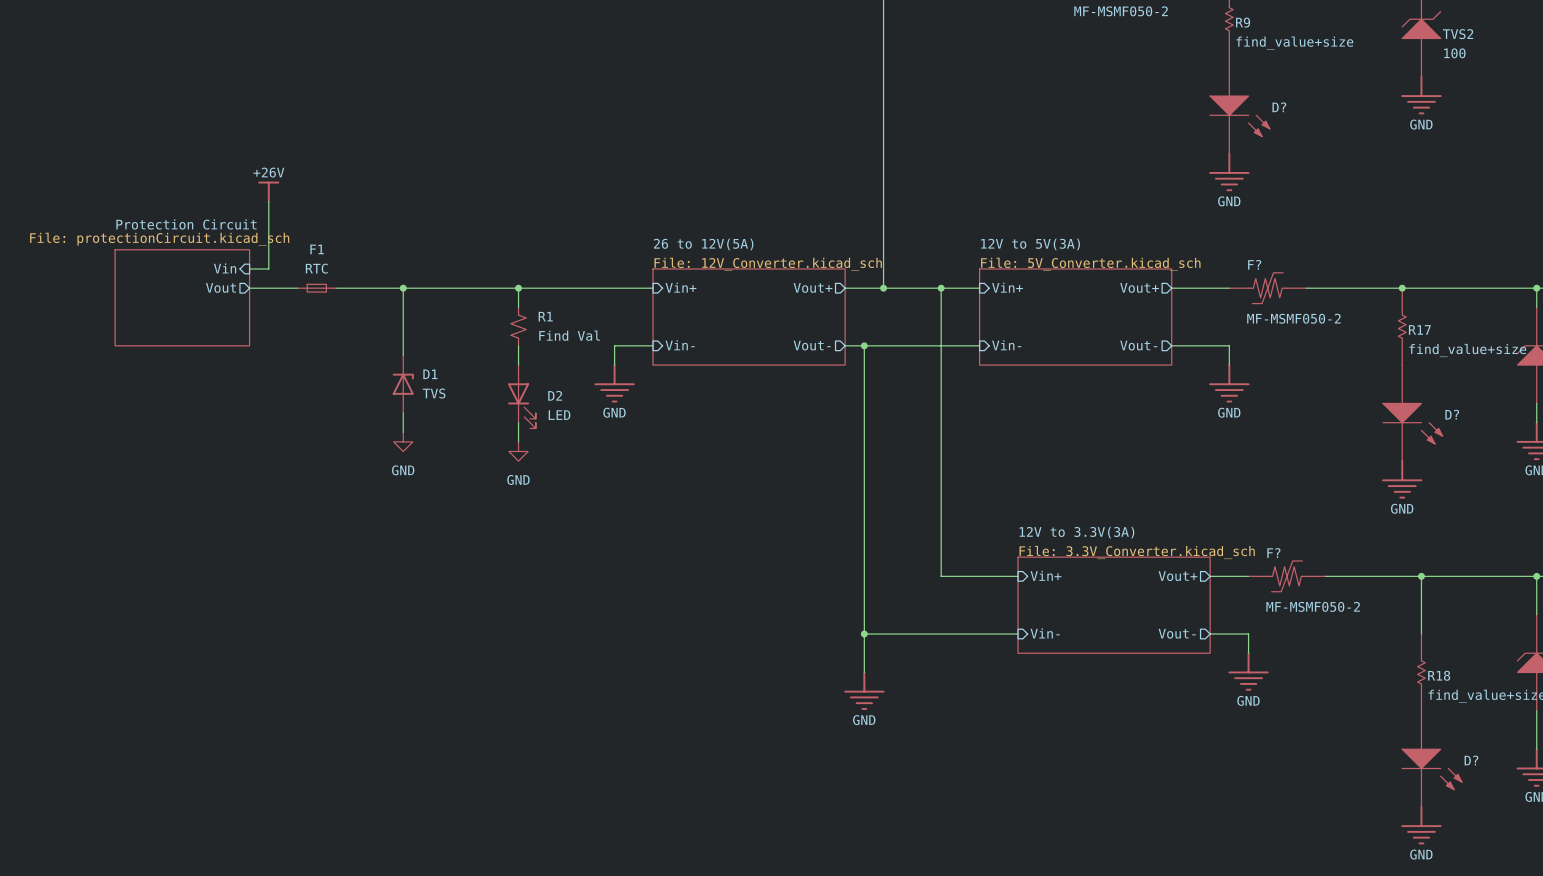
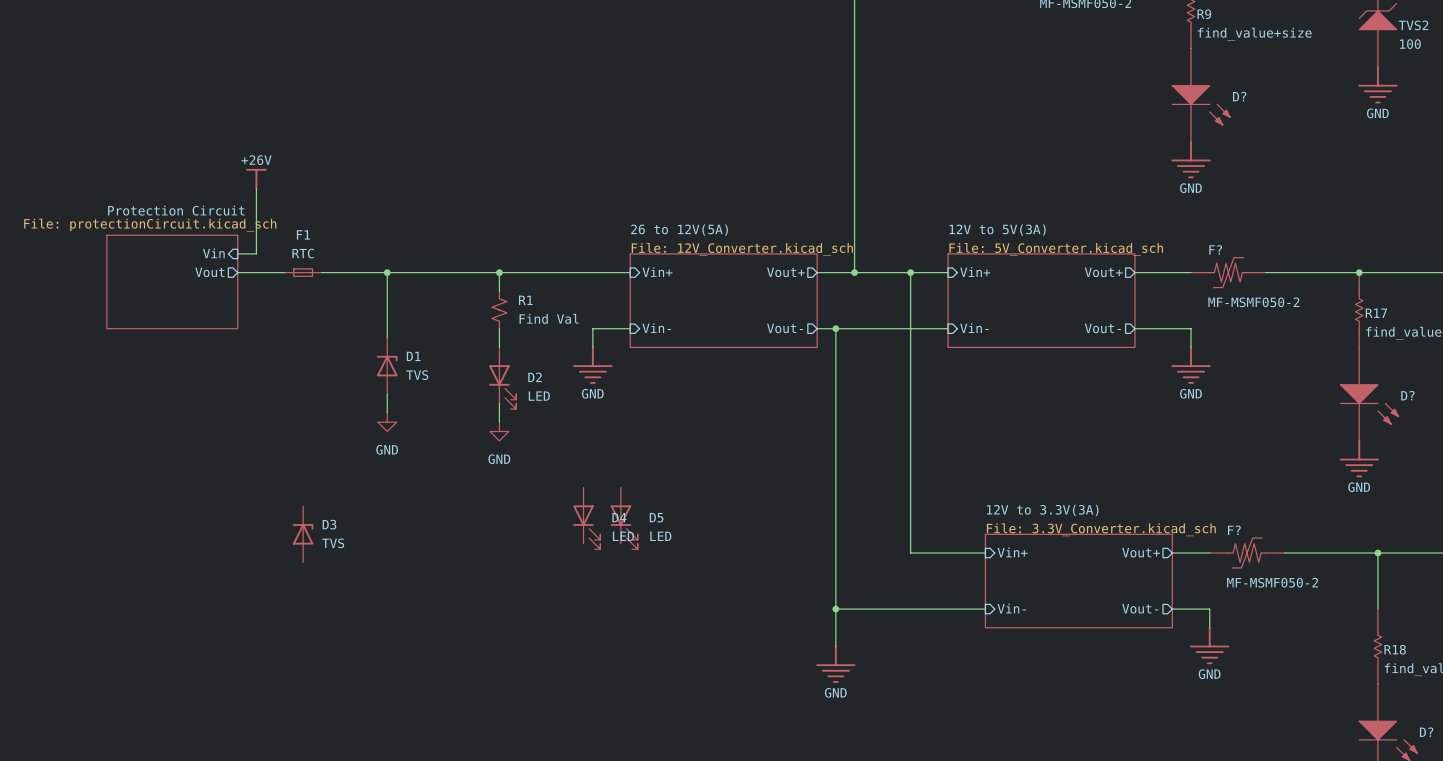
D4: none -> LED (586, 518)
D5: none -> LED (624, 518)
D3: none -> TVS (303, 534)

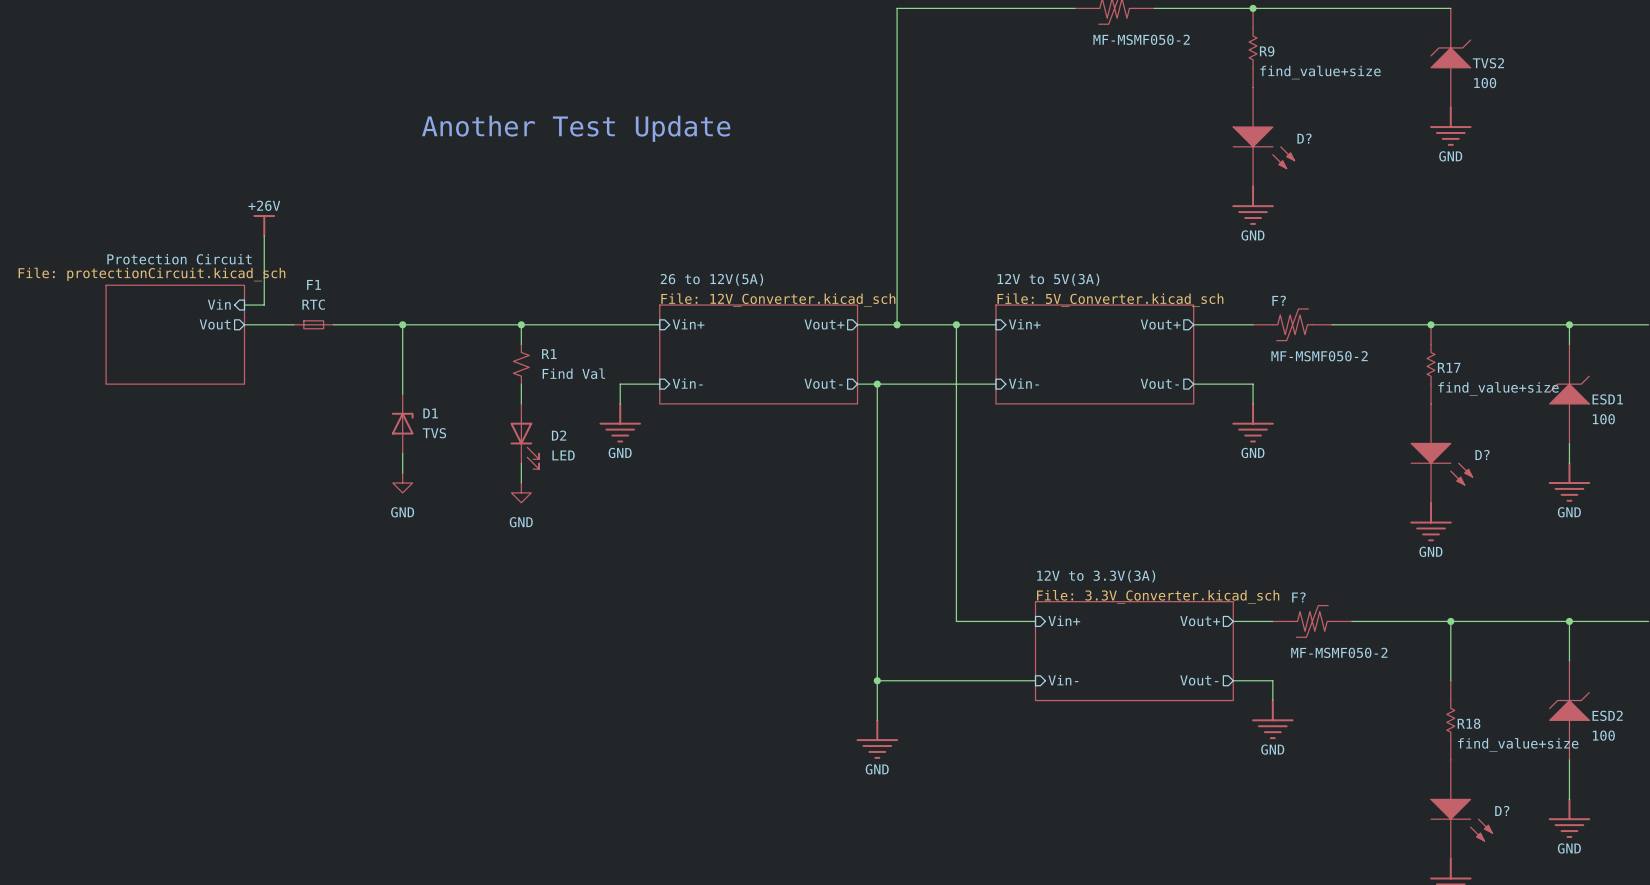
text: none -> Another Test Update (576, 128)
D4: LED (586, 518) -> none
D5: LED (624, 518) -> none
D3: TVS (303, 534) -> none

